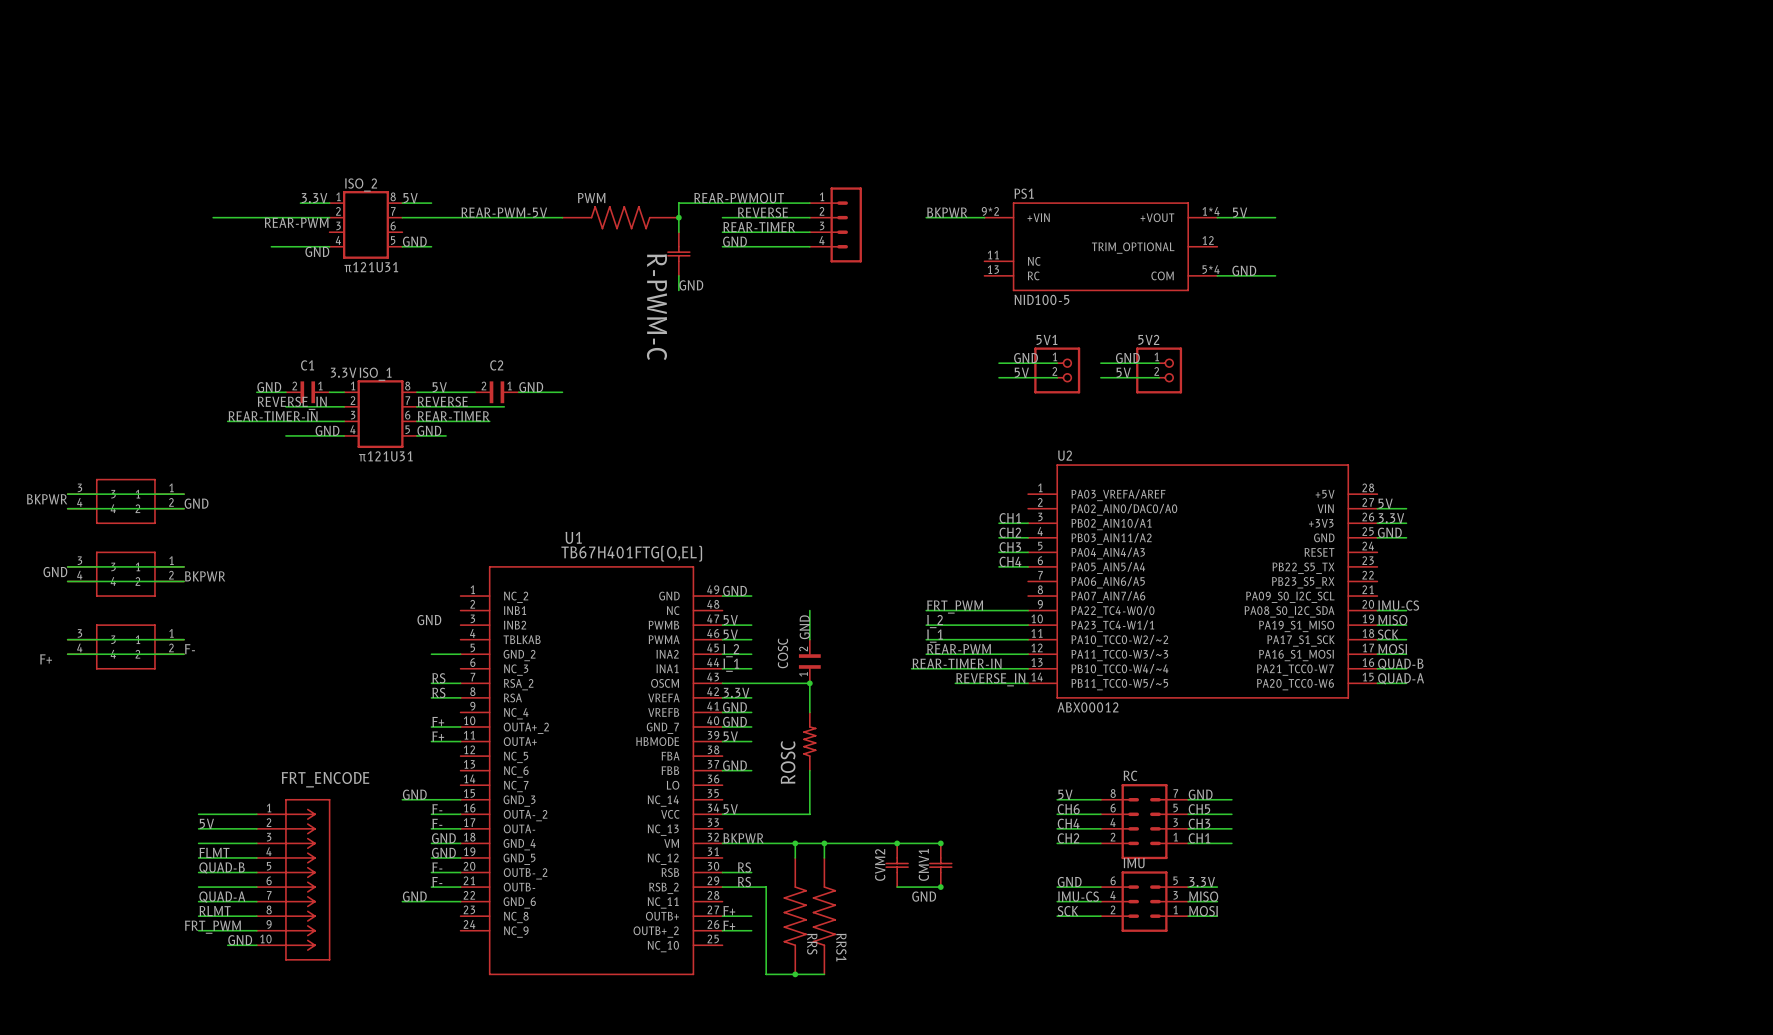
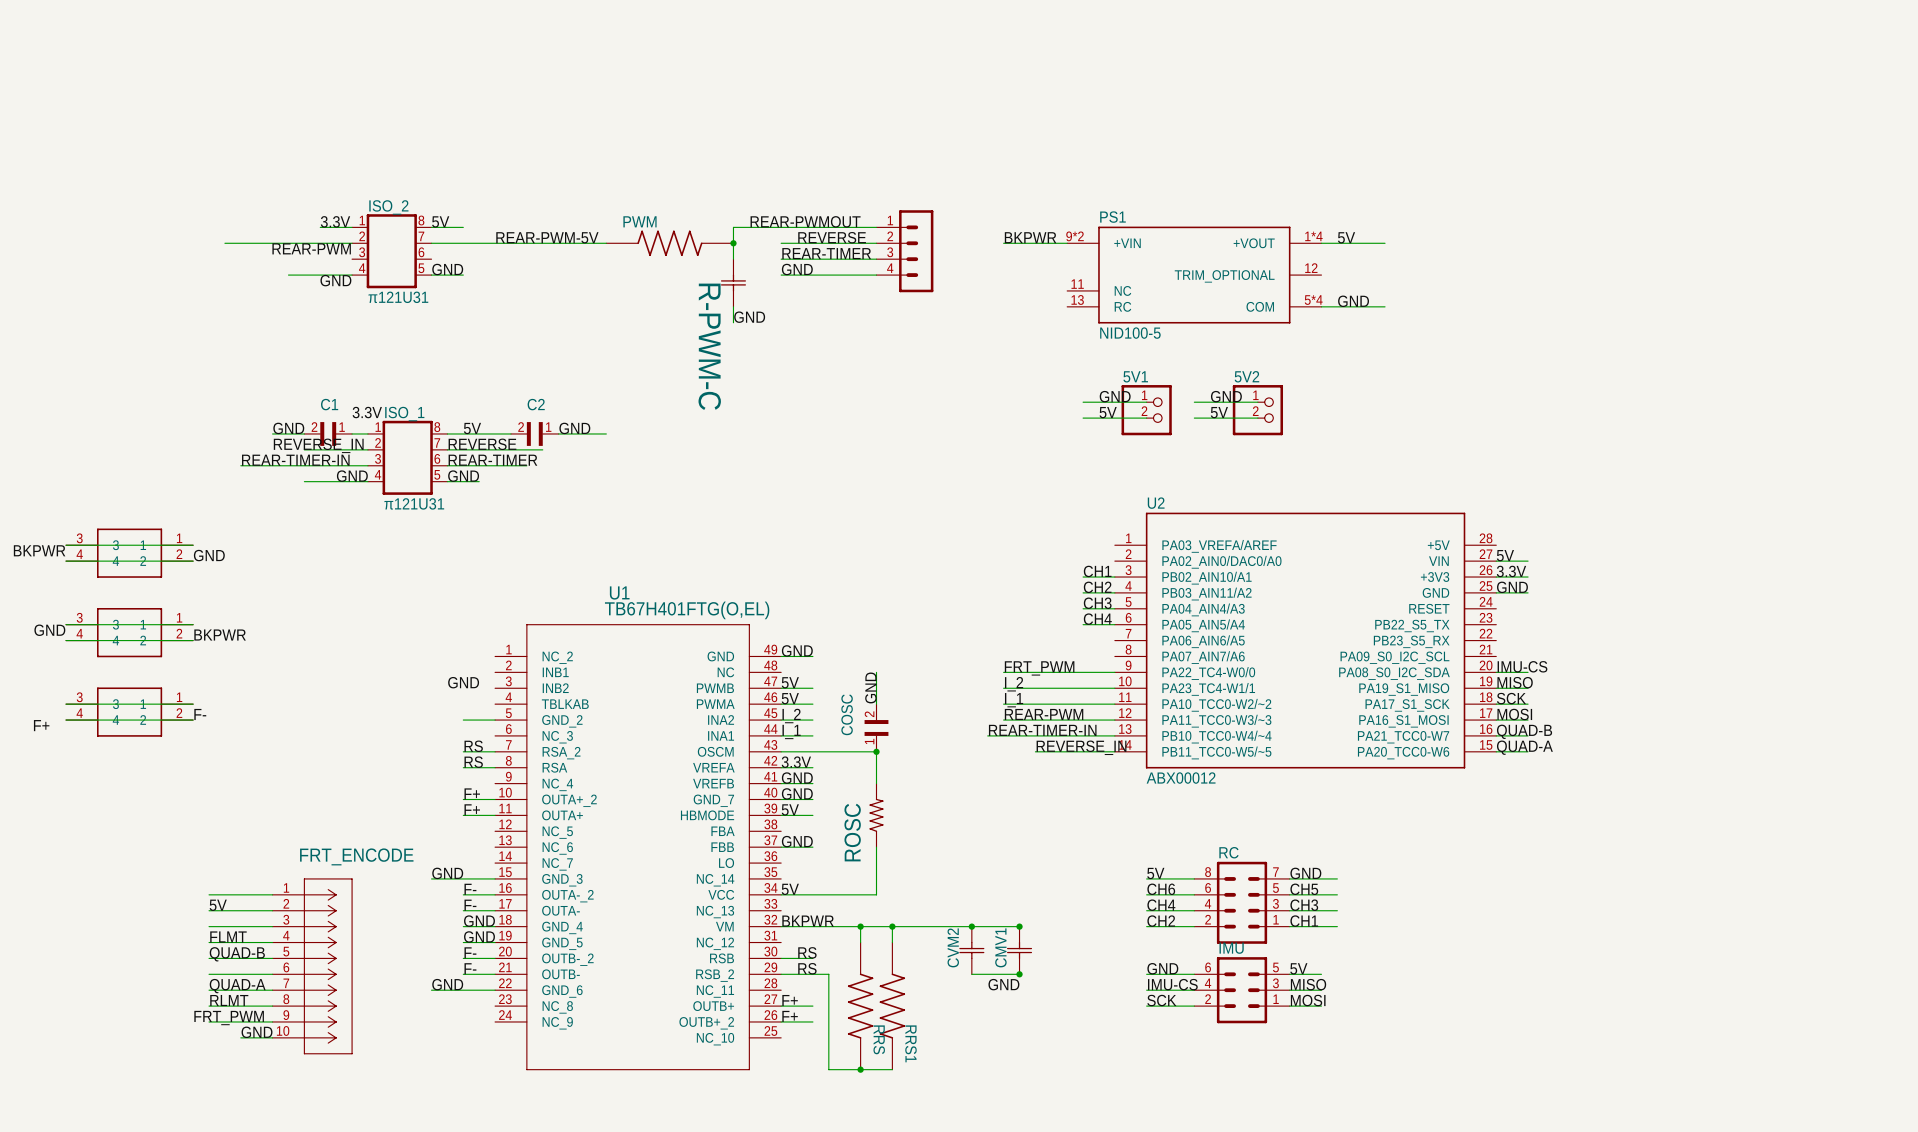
label: 3.3V (1202, 882) -> 5V (1298, 968)

